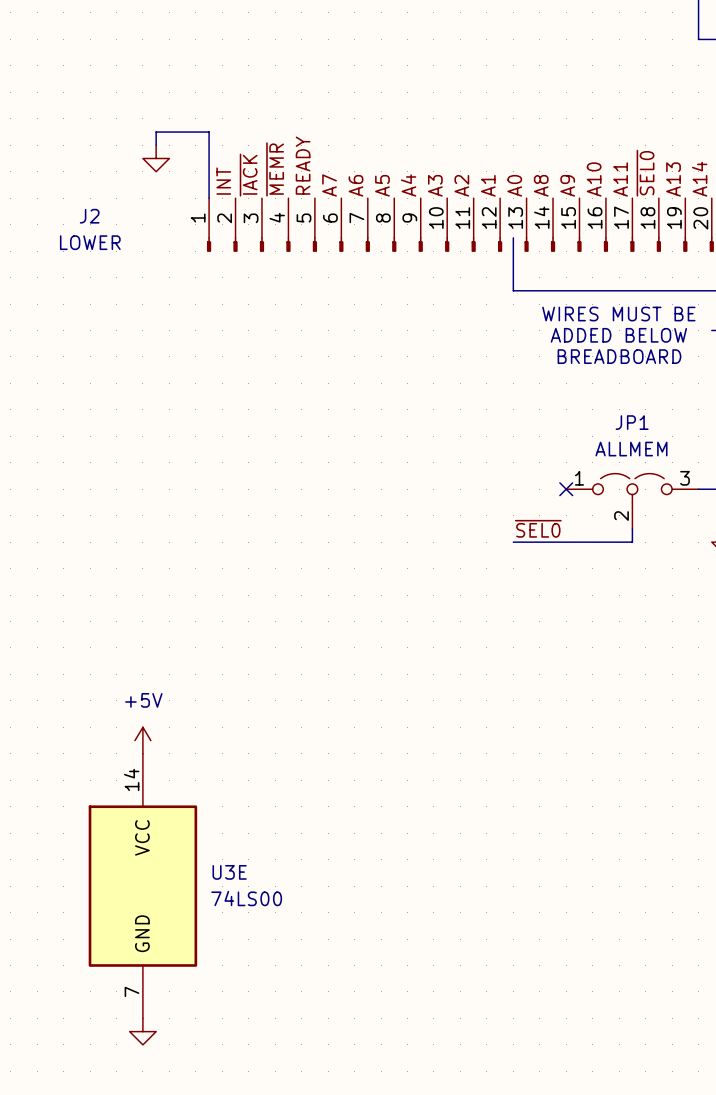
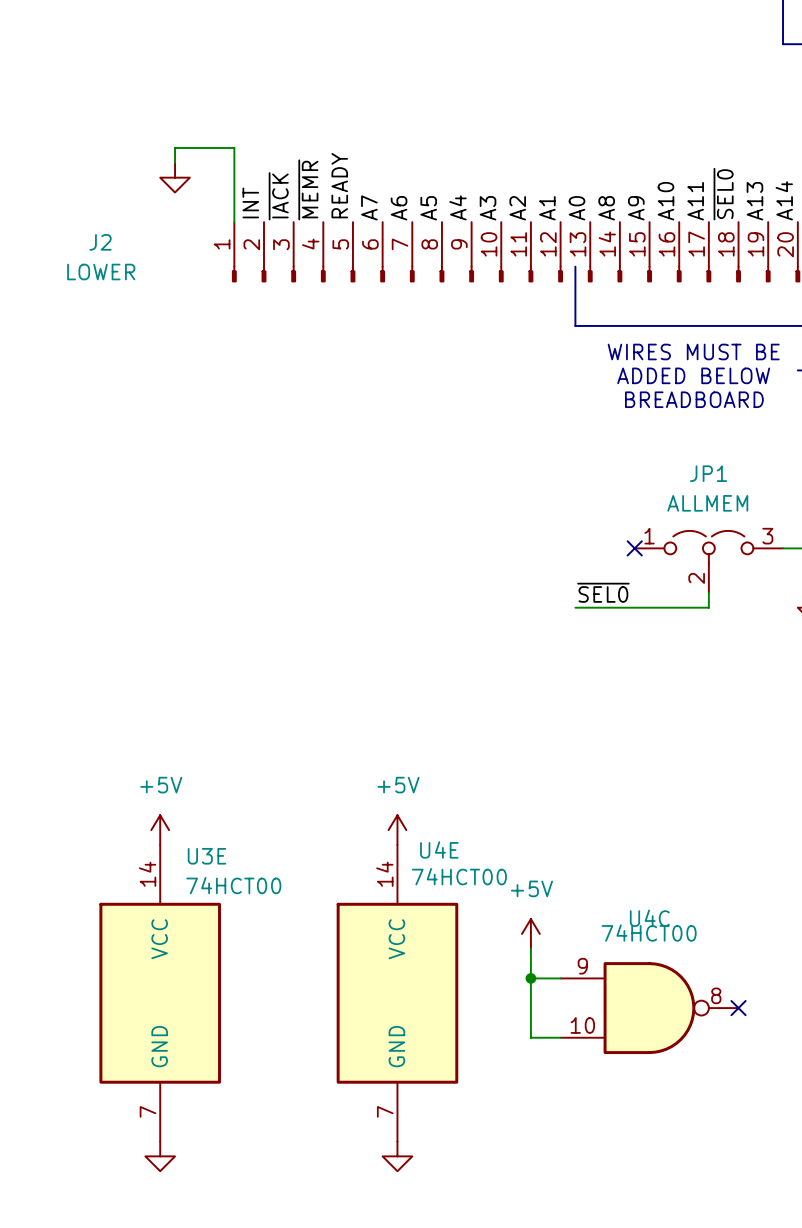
power symbol: none -> +5V (397, 830)
power symbol: none -> +5V (530, 933)
wire: none -> (530, 948) (530, 1037) (560, 1037)
U3E name position: U3E (229, 872) -> U3E (206, 856)
wire: none -> (530, 978) (560, 978)
junction: none -> (530, 978)
U4E: none -> 74HCT00 (397, 993)
U3E value: 74LS00 (246, 898) -> 74HCT00 (233, 885)
U4C: none -> 74HCT00 (649, 1008)
no-connect mark: none -> (738, 1008)
power symbol: none -> (397, 1156)

